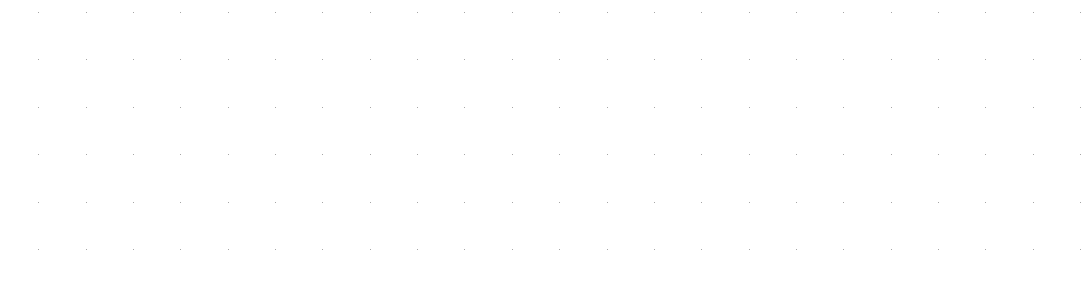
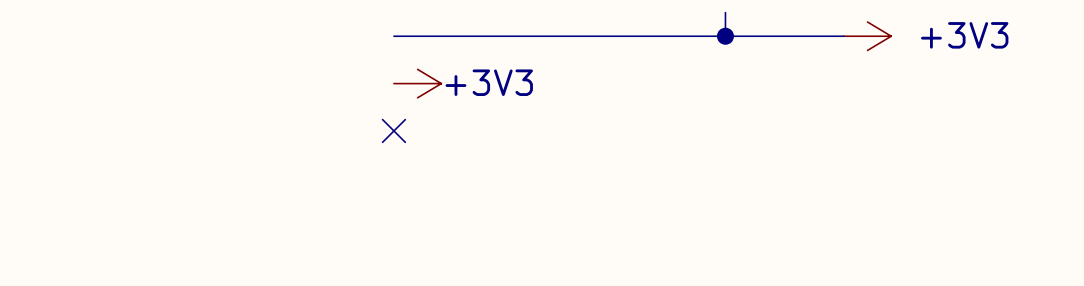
wire: none -> (725, 12) (725, 36)
wire: none -> (393, 36) (843, 36)
junction: none -> (725, 36)
power symbol: none -> +3V3 (867, 36)
power symbol: none -> +3V3 (417, 83)
no-connect mark: none -> (393, 130)

